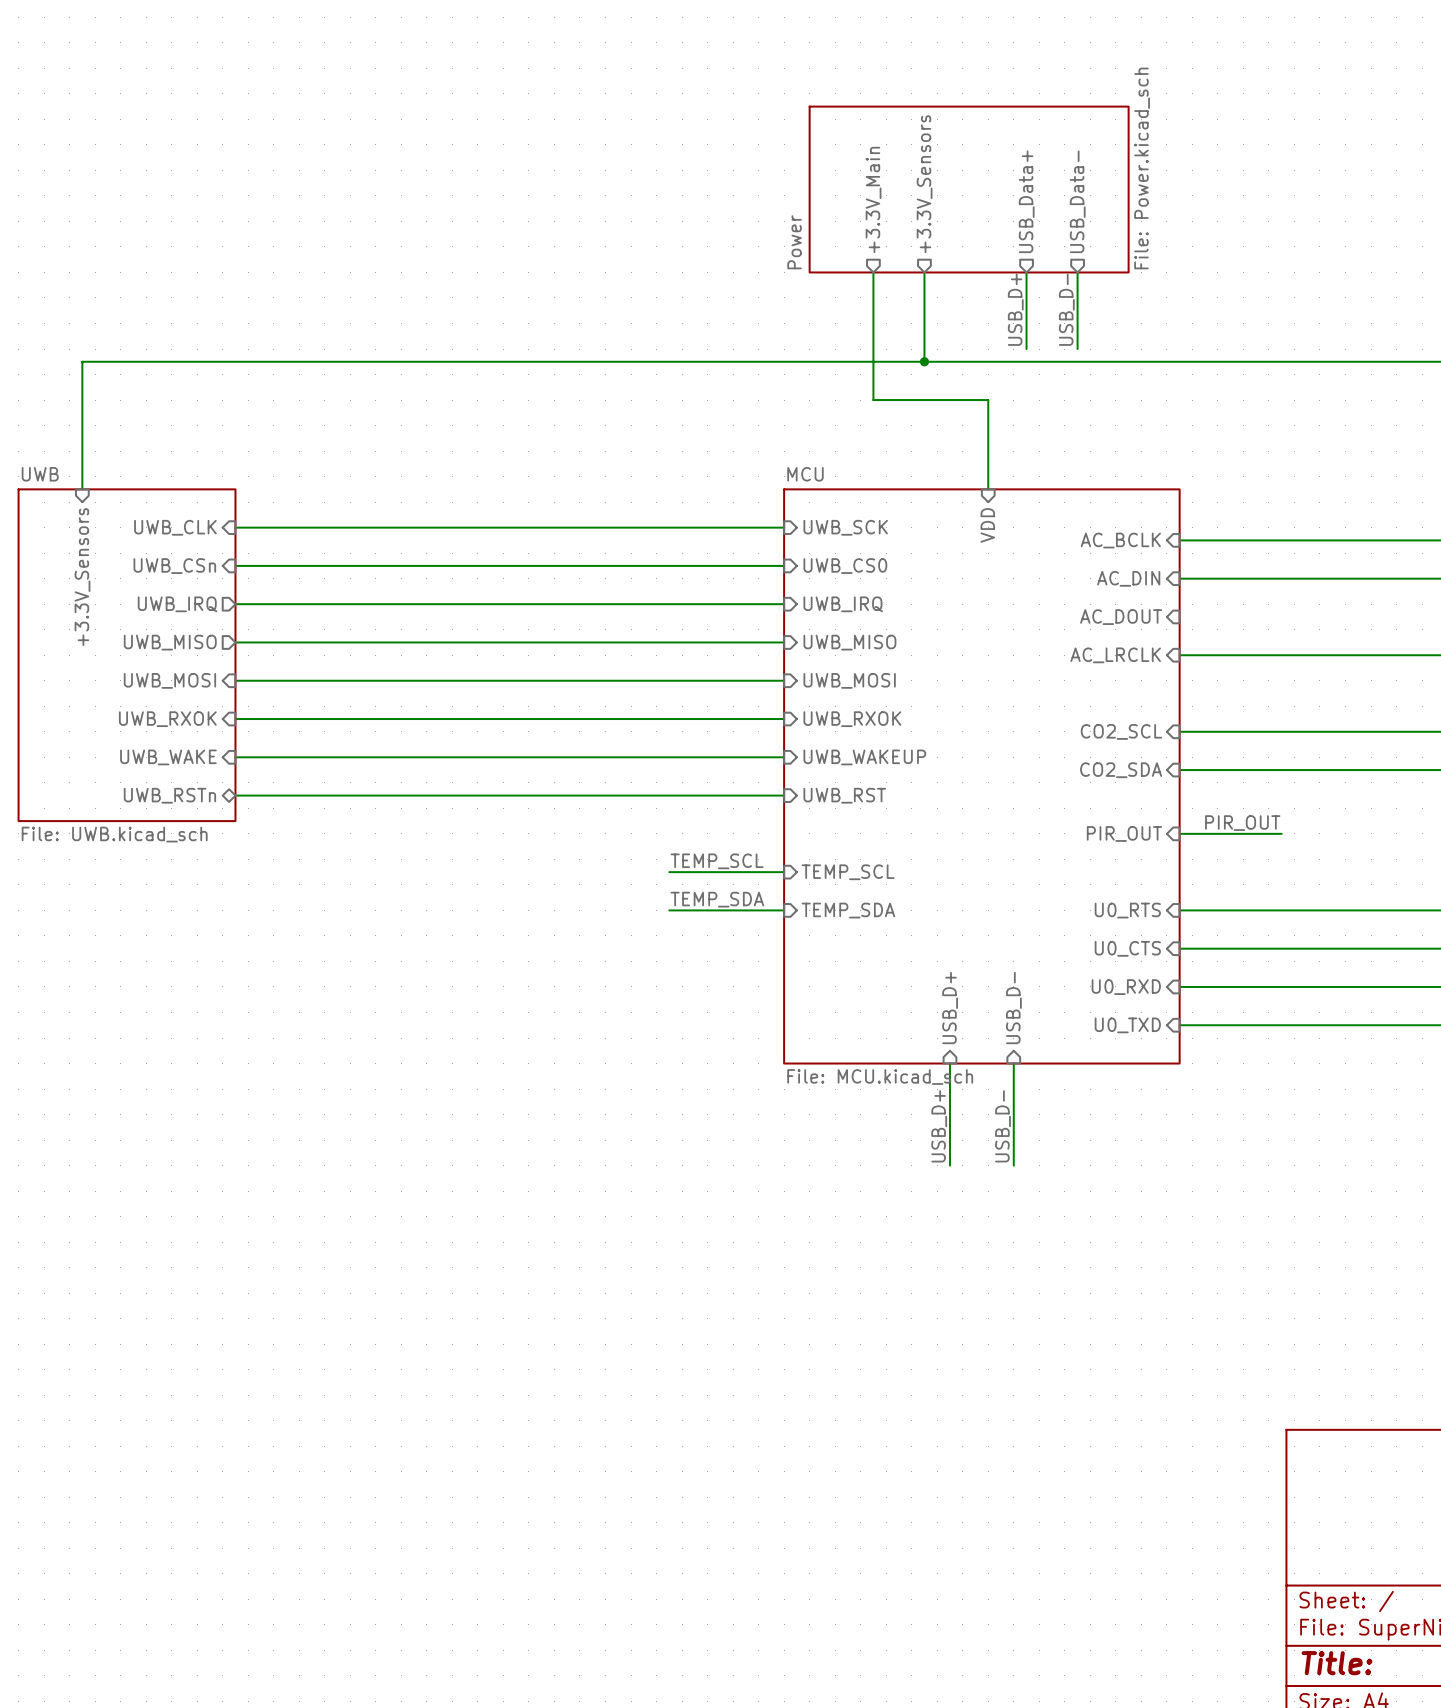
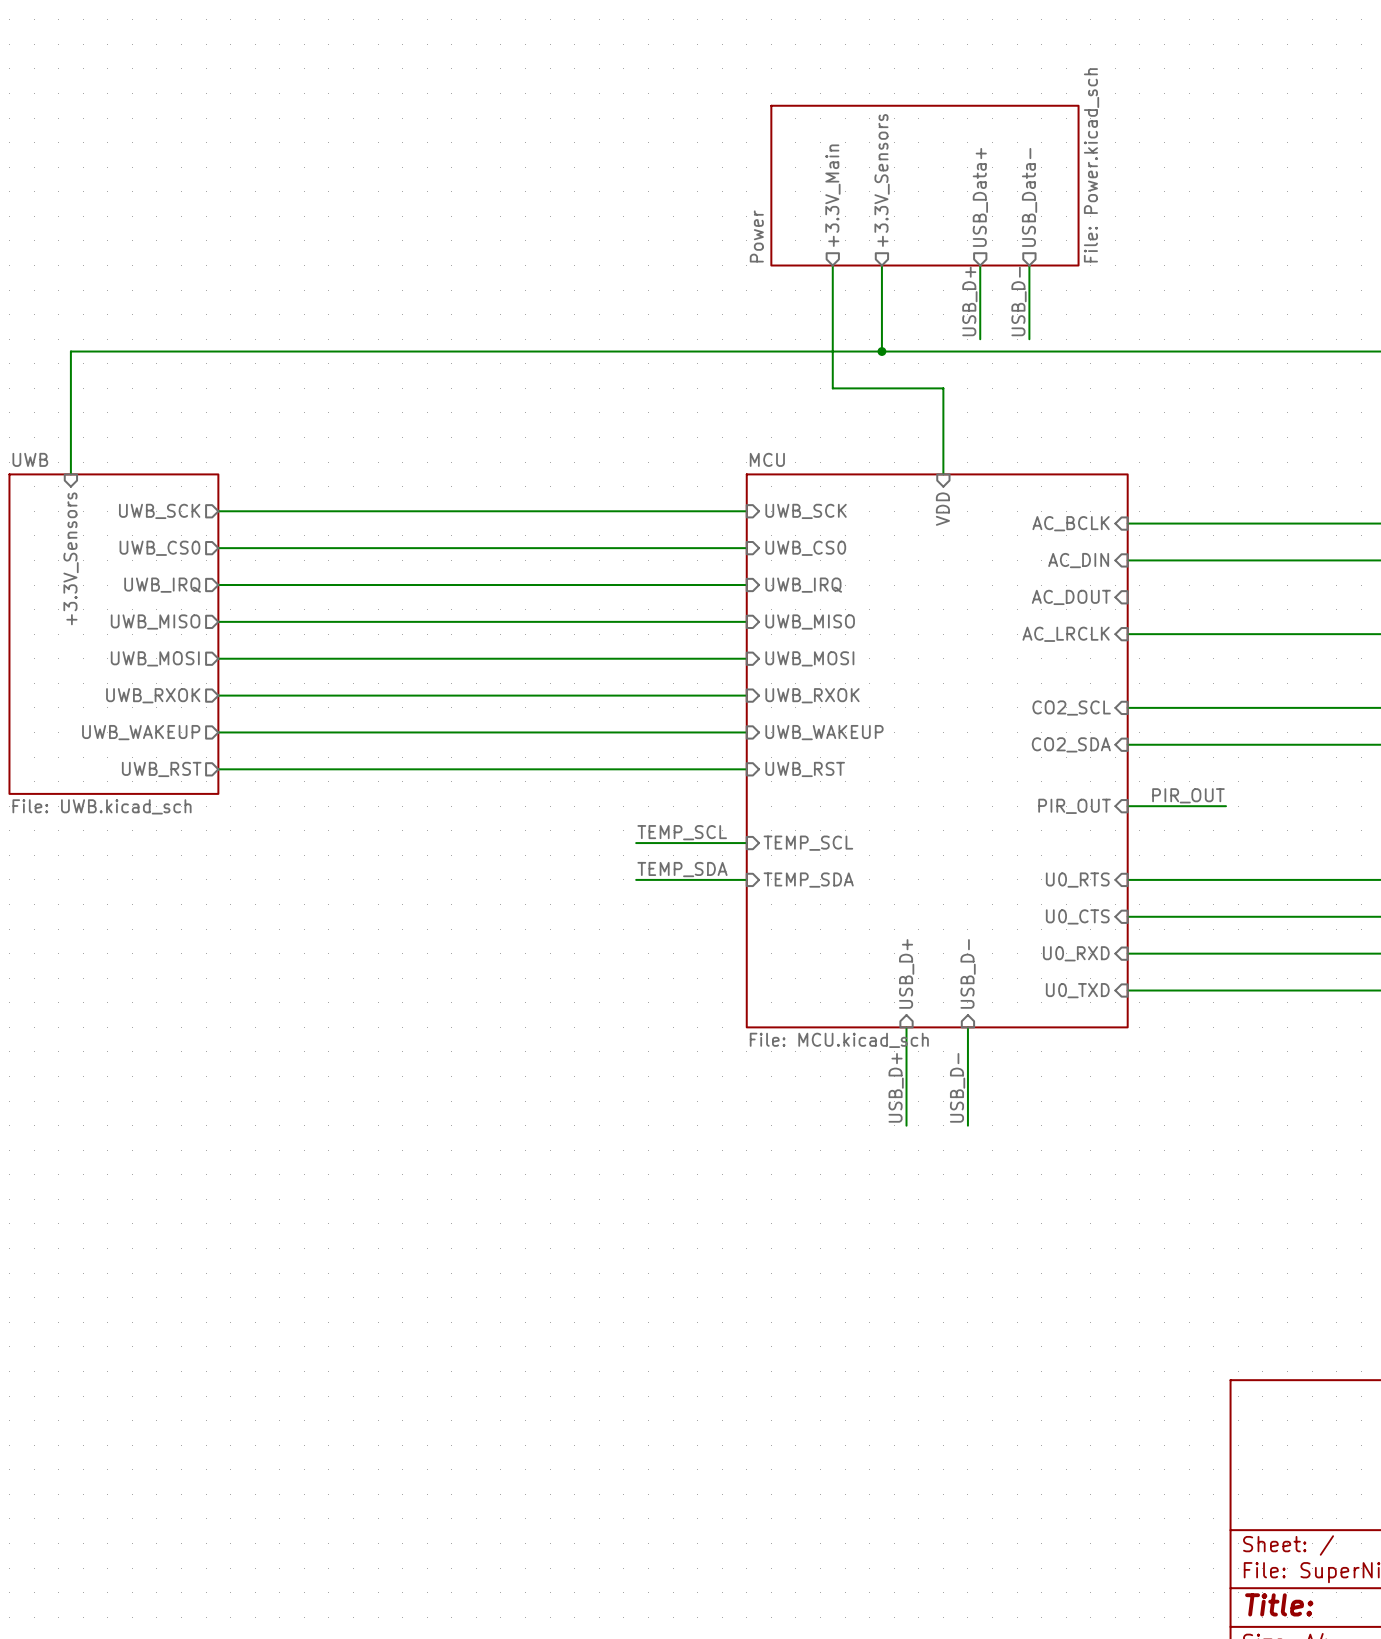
sheet pin shape: input (175, 527) -> output (159, 511)
sheet pin: UWB_CLK (175, 527) -> UWB_SCK (159, 511)
sheet pin shape: input (174, 566) -> output (159, 548)
sheet pin: UWB_CSn (174, 566) -> UWB_CS0 (159, 548)
sheet pin shape: input (169, 680) -> output (155, 658)
sheet pin shape: input (167, 719) -> output (153, 695)
sheet pin shape: input (168, 757) -> output (141, 732)
sheet pin: UWB_WAKE (168, 757) -> UWB_WAKEUP (141, 732)
sheet pin shape: bidirectional (169, 795) -> output (161, 769)
sheet pin: UWB_RSTn (169, 795) -> UWB_RST (161, 769)

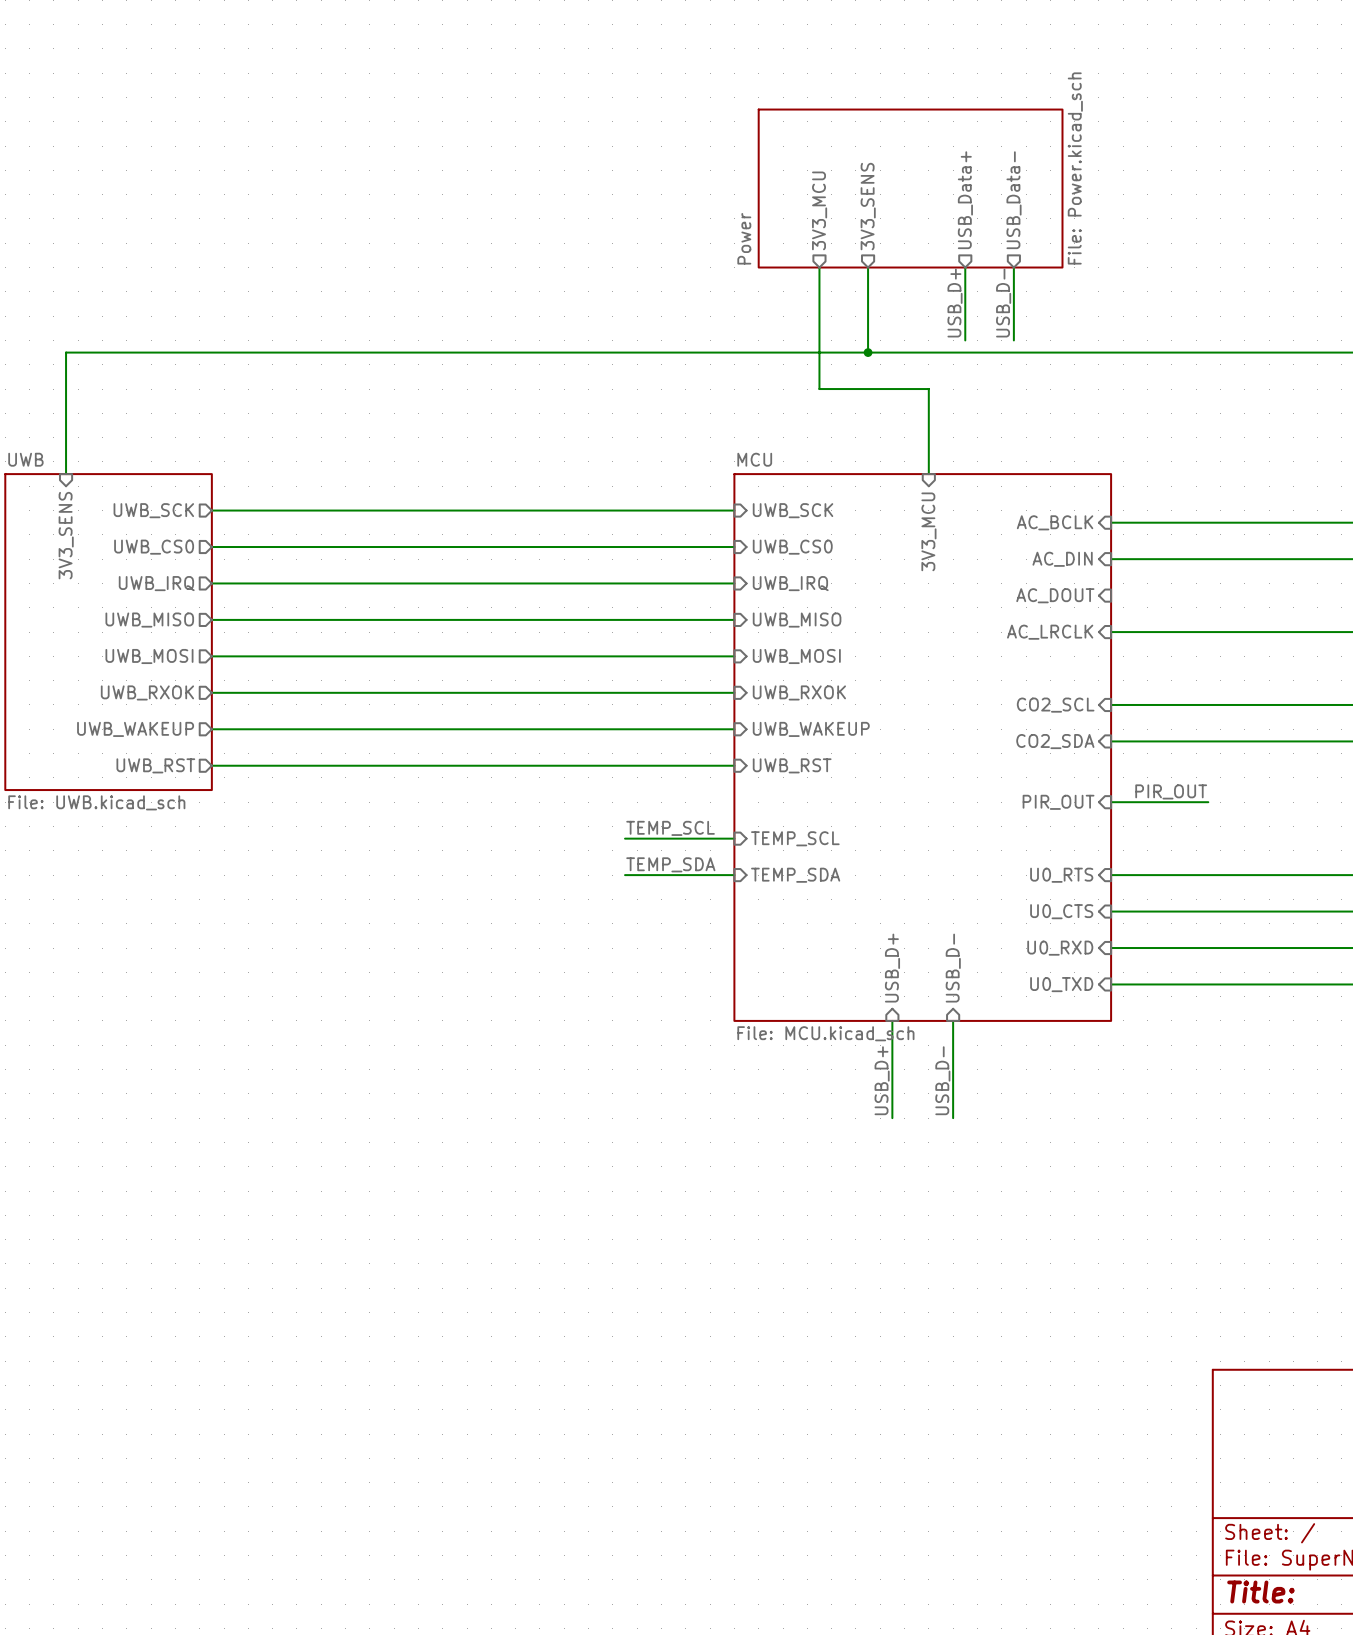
sheet pin: +3.3V_Sensors (882, 180) -> 3V3_SENS (868, 206)
sheet pin: +3.3V_Main (832, 195) -> 3V3_MCU (819, 210)
sheet pin: VDD (942, 509) -> 3V3_MCU (928, 531)
sheet pin: +3.3V_Sensors (71, 558) -> 3V3_SENS (66, 535)

